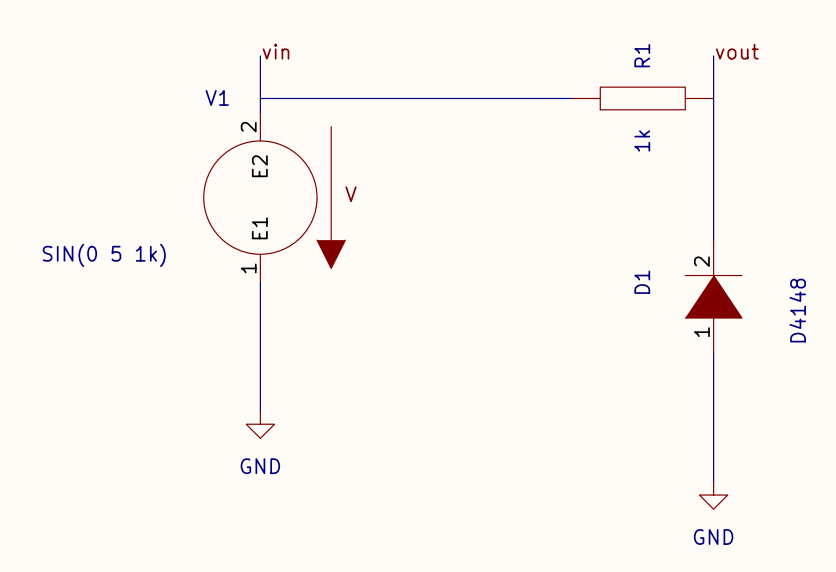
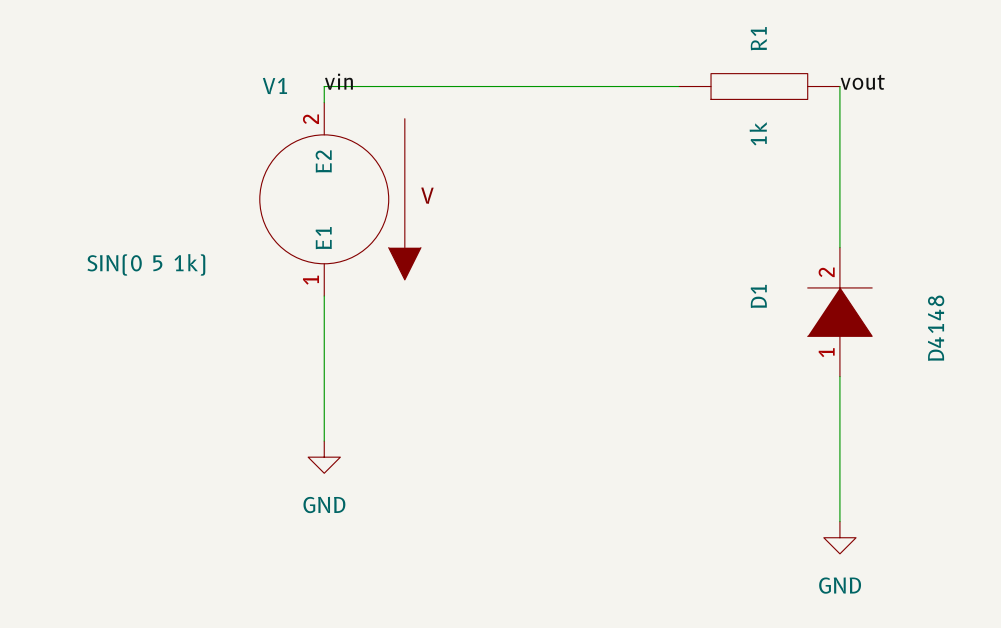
label position: vin (276, 51) -> vin (338, 81)
label position: vout (737, 51) -> vout (862, 82)
wire: (260, 55) (260, 98) -> none
wire: (713, 55) (713, 98) -> none

